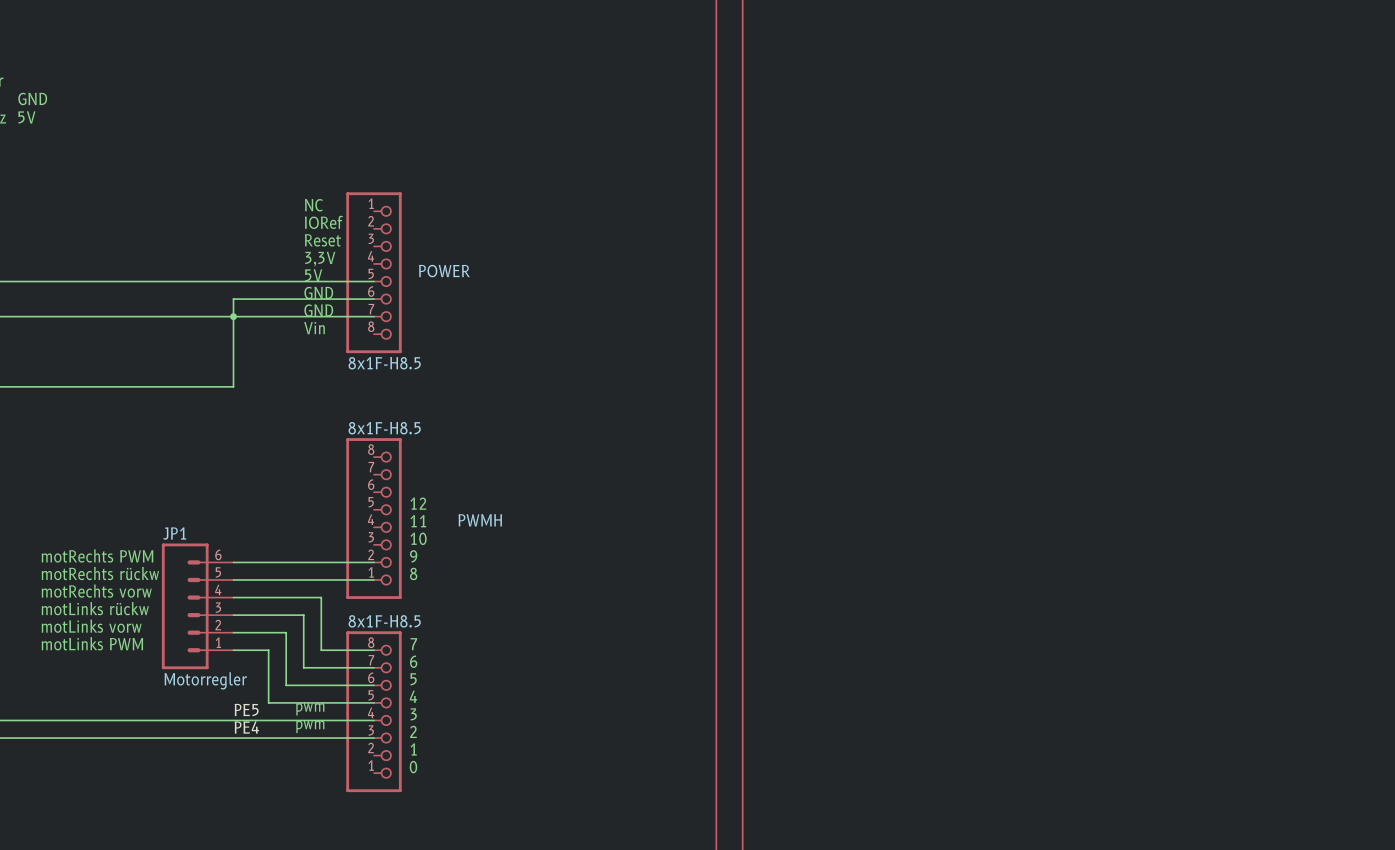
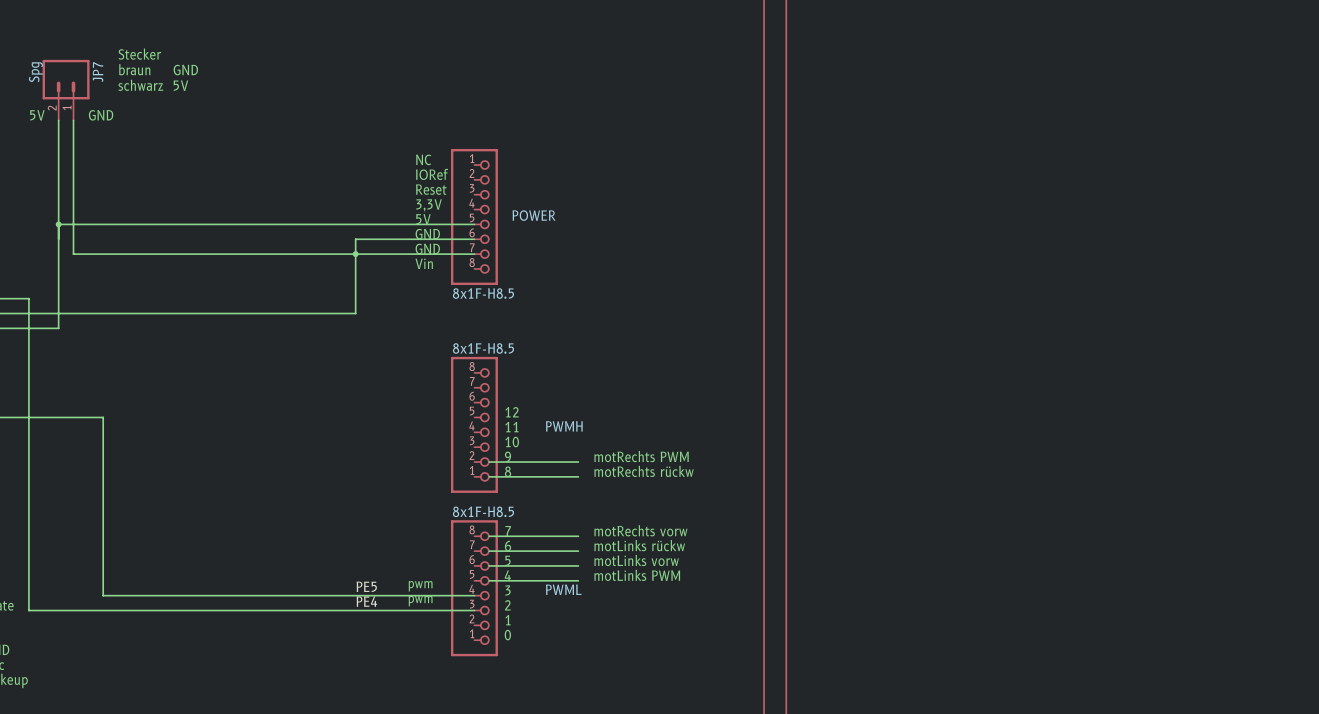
text: motRechts PWM (97, 555) -> none
text: none -> motRechts PWM (641, 456)
wire: (233, 562) (373, 562) -> none
wire: none -> (489, 462) (578, 462)
text: motRechts rückw (100, 573) -> none
text: none -> motRechts rückw (644, 471)
wire: (233, 580) (373, 580) -> none
wire: none -> (489, 476) (578, 476)
text: motRechts vorw (96, 591) -> none
wire: (233, 597) (321, 597) (321, 650) (373, 650) -> none
JP1: Motorregler (197, 606) -> none
text: motLinks rückw (95, 608) -> none
wire: (233, 615) (303, 615) (303, 667) (373, 667) -> none
text: motLinks vorw (91, 626) -> none
wire: (233, 632) (286, 632) (286, 685) (373, 685) -> none
text: motLinks PWM (92, 643) -> none
text: none -> motRechts vorw (640, 530)
wire: (233, 650) (268, 650) (268, 702) (373, 702) -> none
wire: none -> (489, 536) (578, 536)
text: none -> motLinks rückw (639, 545)
wire: none -> (489, 551) (578, 551)
text: none -> motLinks vorw (636, 560)
wire: none -> (489, 565) (578, 565)
text: none -> motLinks PWM (637, 575)
wire: none -> (489, 580) (578, 580)
PWML name: none -> PWML (563, 589)

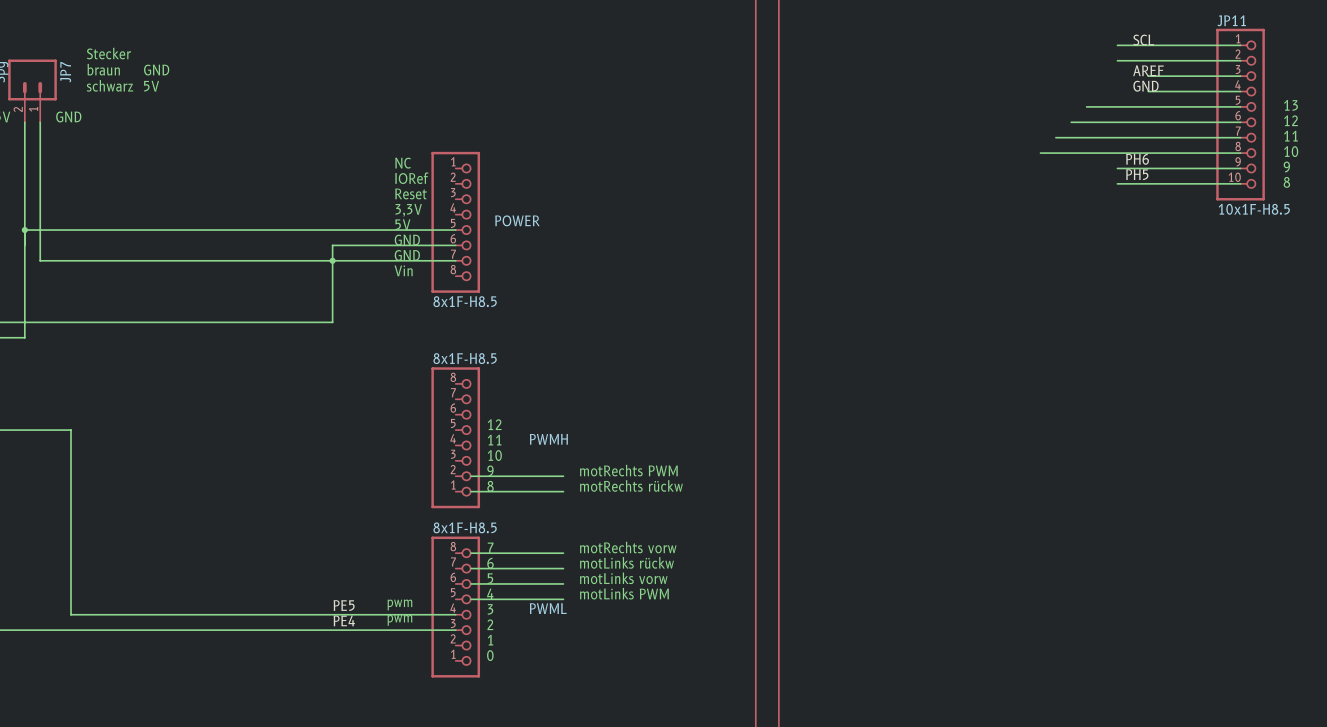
label: none -> SCL (1143, 40)
wire: none -> (1117, 45) (1240, 45)
wire: none -> (1117, 60) (1240, 60)
label: none -> AREF (1148, 70)
wire: none -> (1148, 76) (1240, 76)
label: none -> GND (1145, 86)
wire: none -> (1148, 91) (1240, 91)
text: none -> 13 (1291, 105)
wire: none -> (1086, 106) (1240, 106)
JP11: none -> 10x1F-H8.5 (1240, 114)
text: none -> 12 (1291, 120)
wire: none -> (1071, 122) (1240, 122)
text: none -> 11 (1290, 136)
wire: none -> (1055, 137) (1240, 137)
text: none -> 10 (1291, 151)
wire: none -> (1040, 153) (1240, 153)
label: none -> PH6 (1137, 159)
text: none -> 9 (1286, 167)
wire: none -> (1117, 168) (1240, 168)
label: none -> PH5 (1137, 174)
text: none -> 8 (1286, 182)
wire: none -> (1117, 183) (1240, 183)

